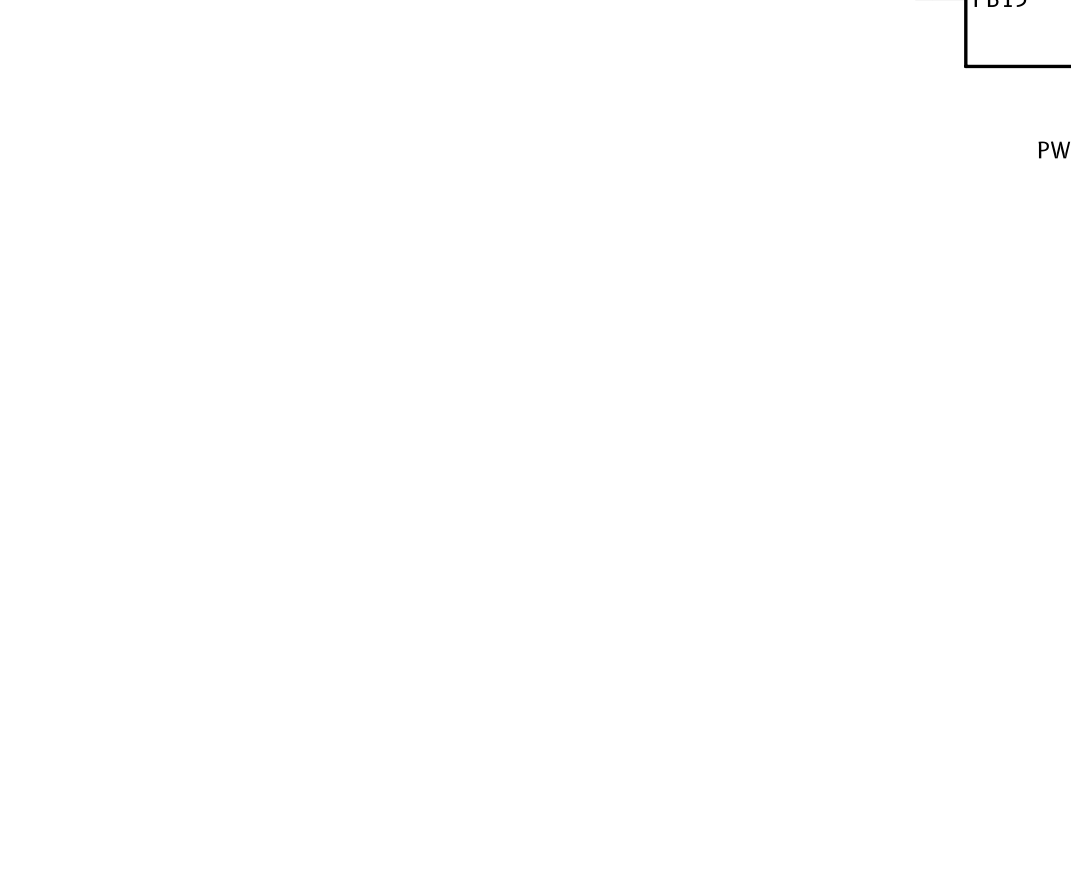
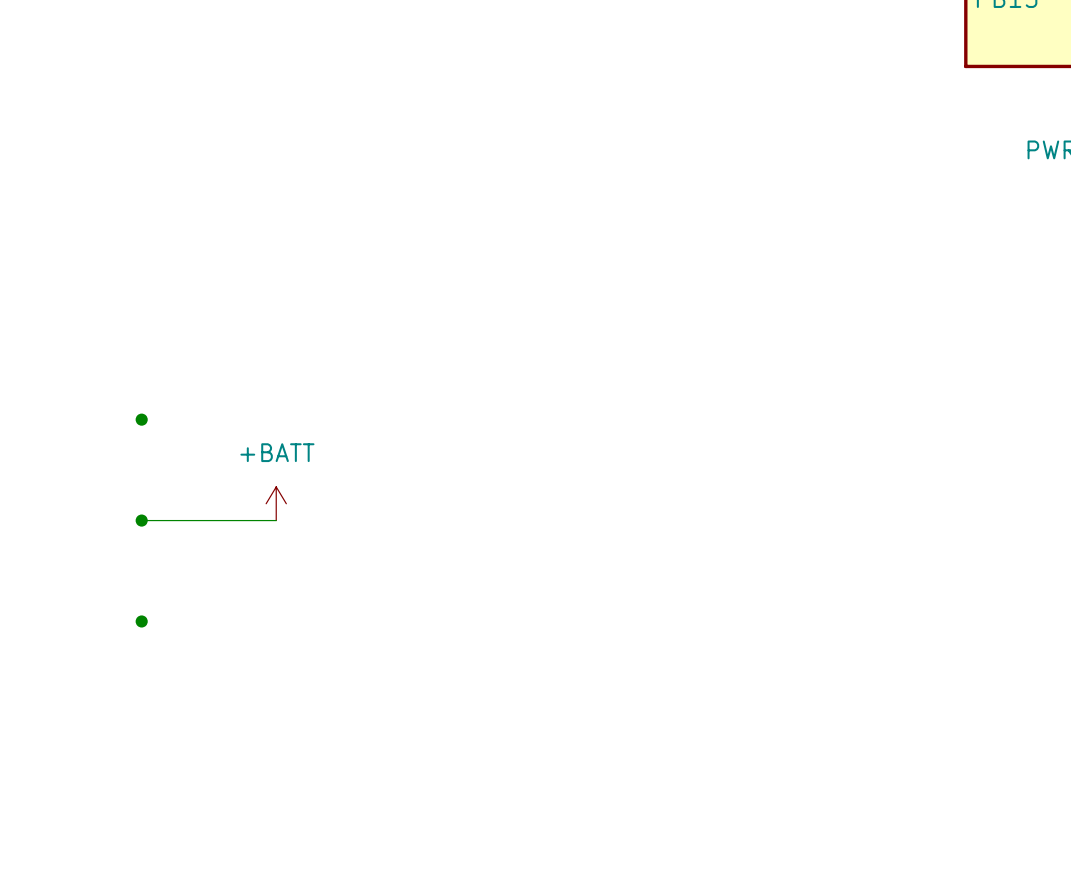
junction: none -> (141, 419)
power symbol: none -> +BATT (276, 503)
wire: none -> (141, 520) (276, 520)
junction: none -> (141, 520)
junction: none -> (141, 621)

